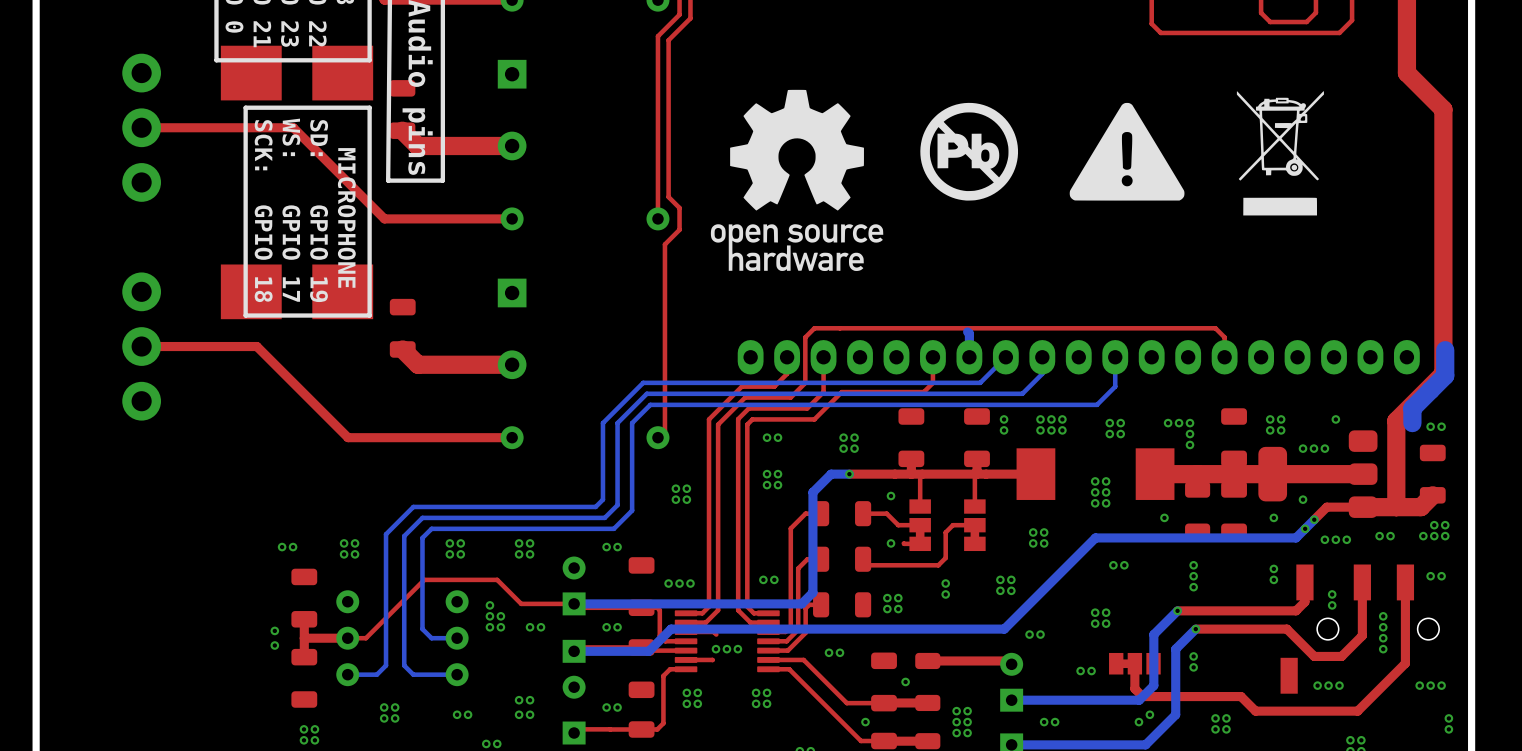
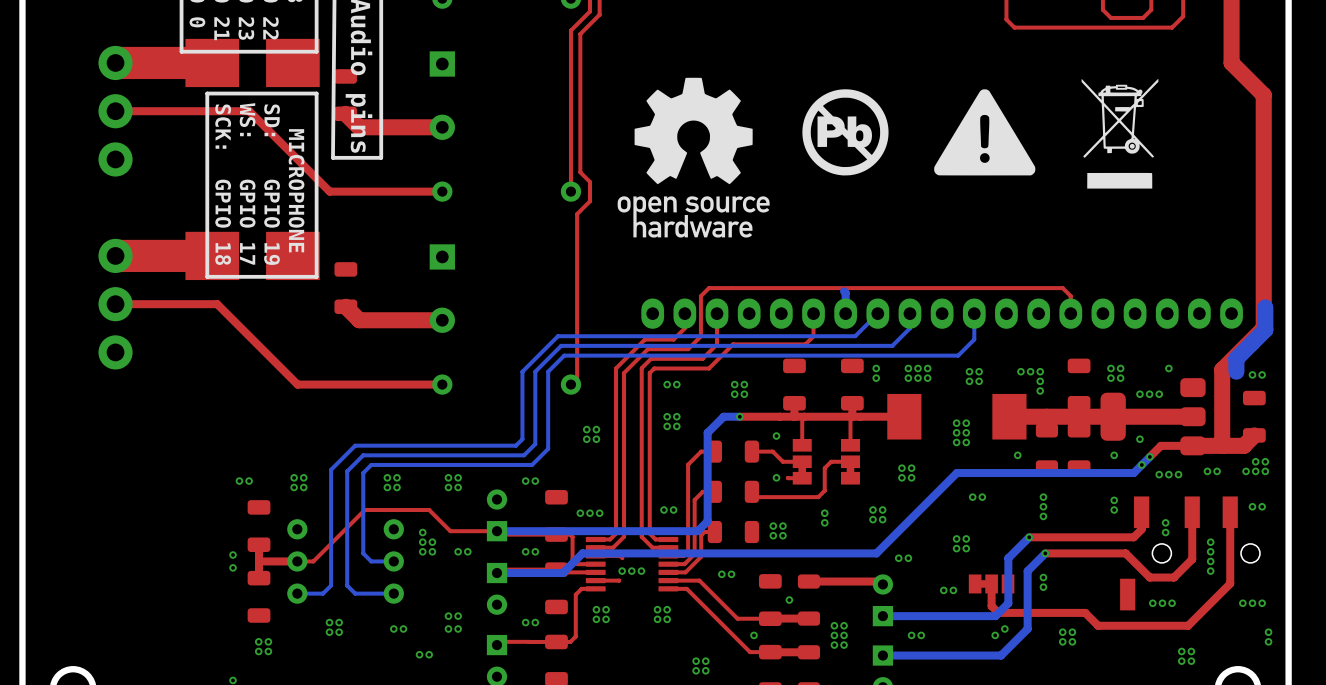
top track: none -> (192, 62) (114, 62)
top track: none -> (192, 255) (114, 255)

